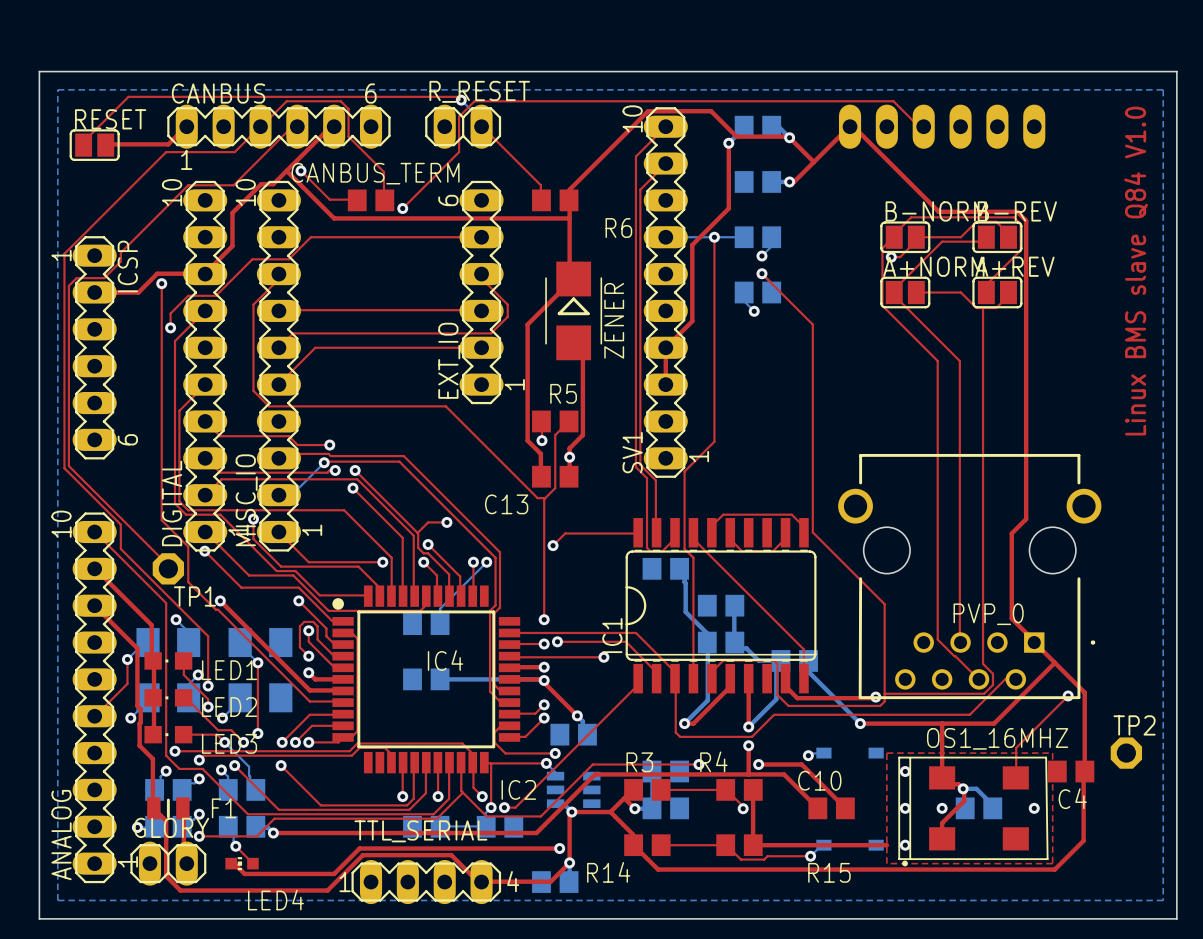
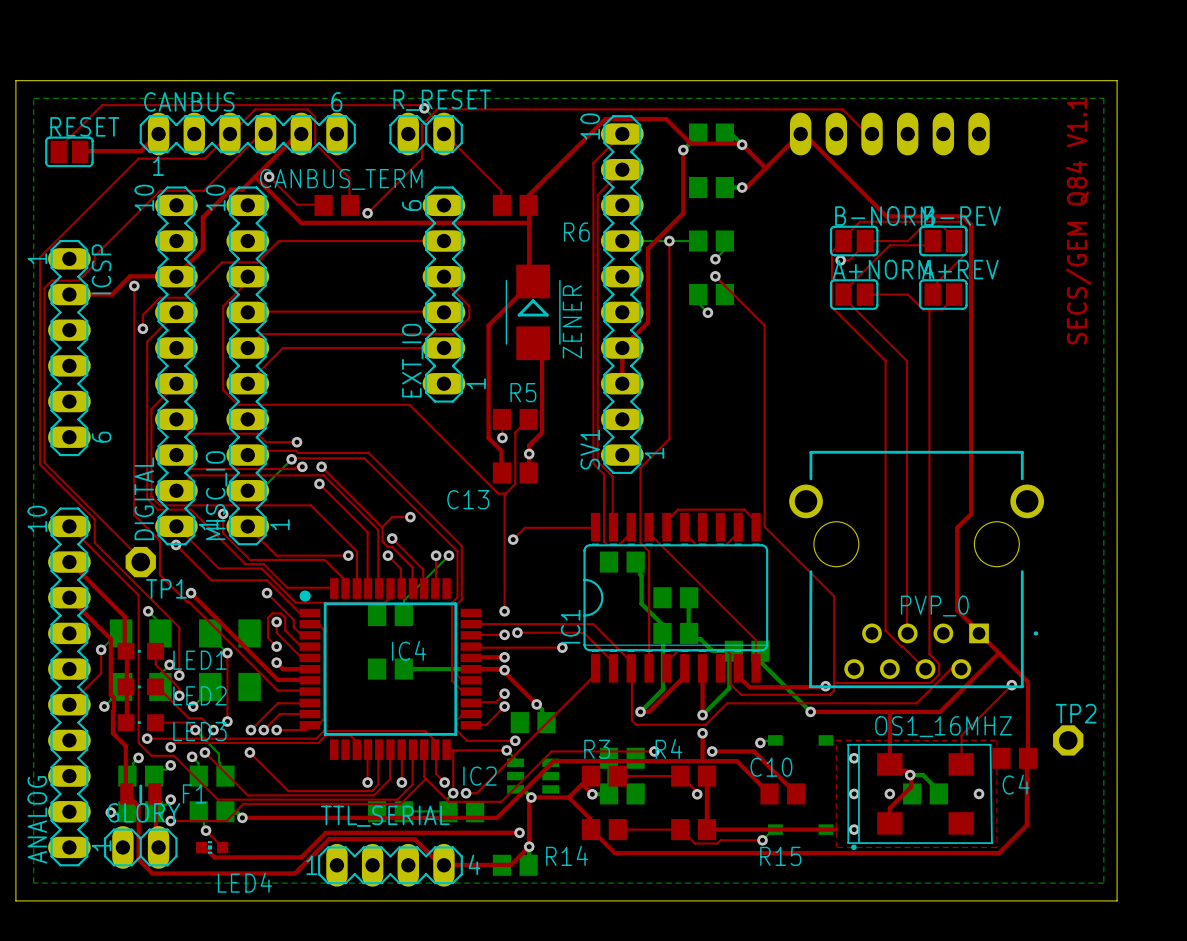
text: none -> SECS/GEM Q84 V1.1 (1078, 220)
text: Linux BMS slave Q84 V1.0 (1136, 271) -> none

